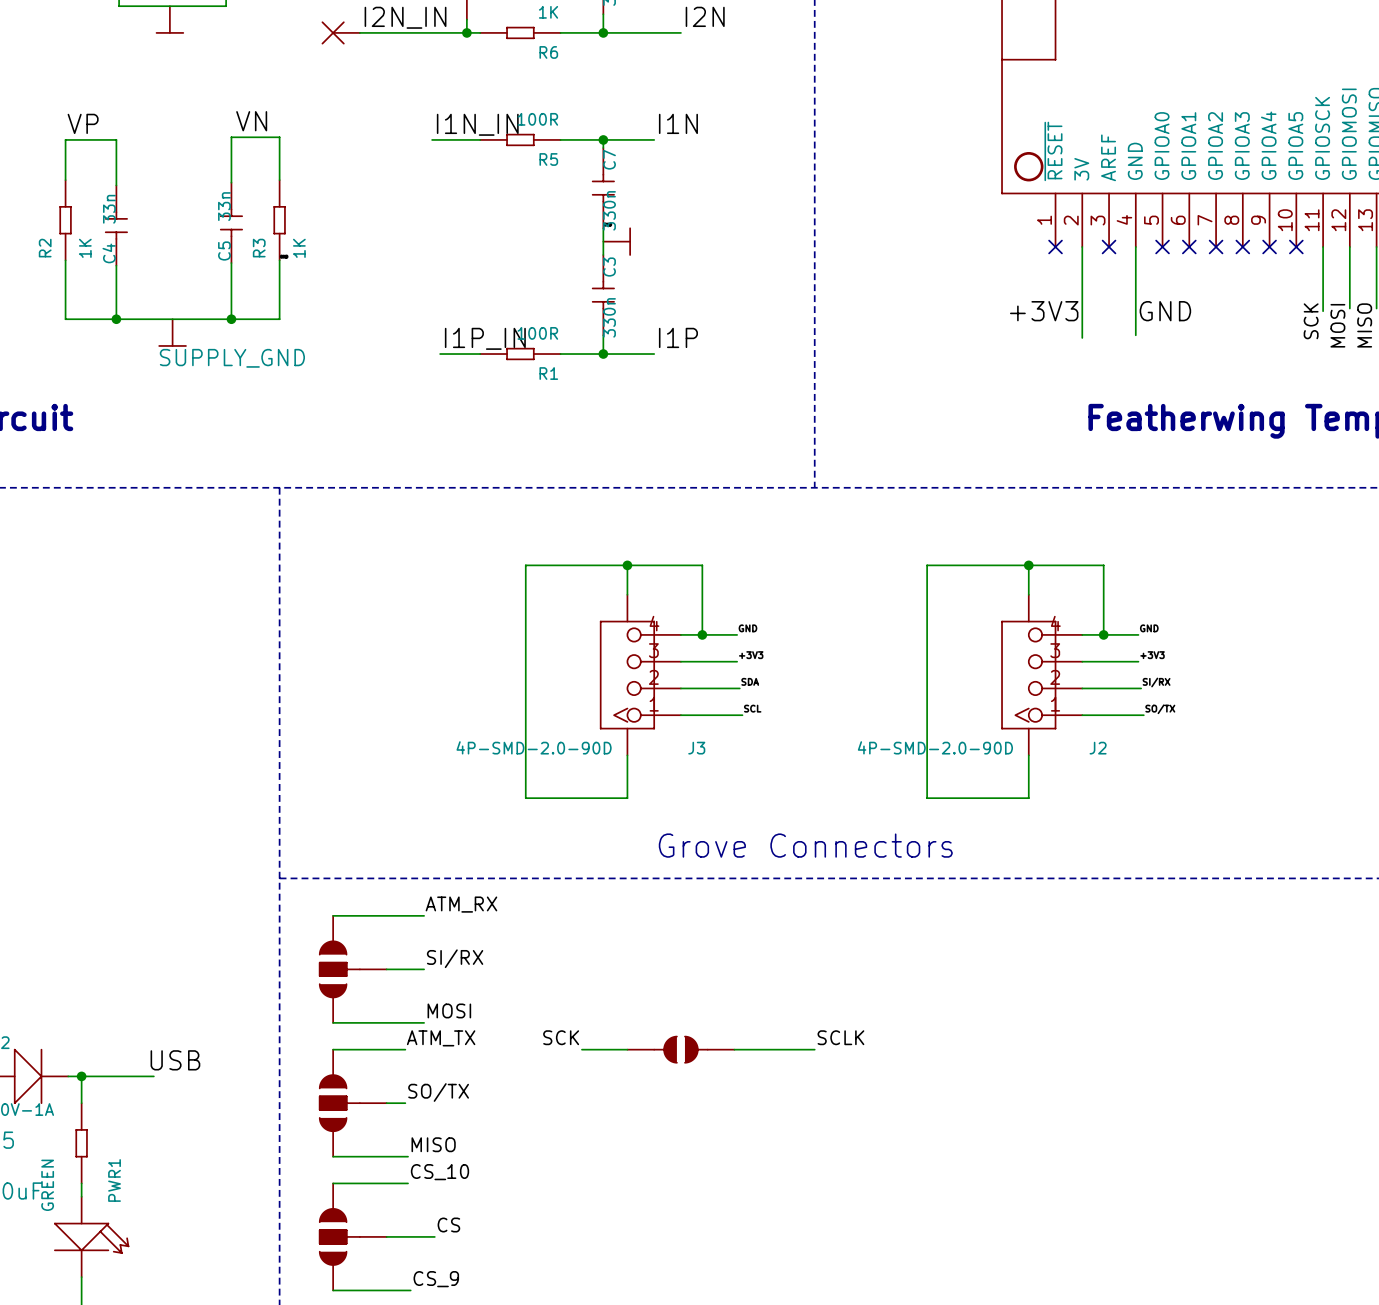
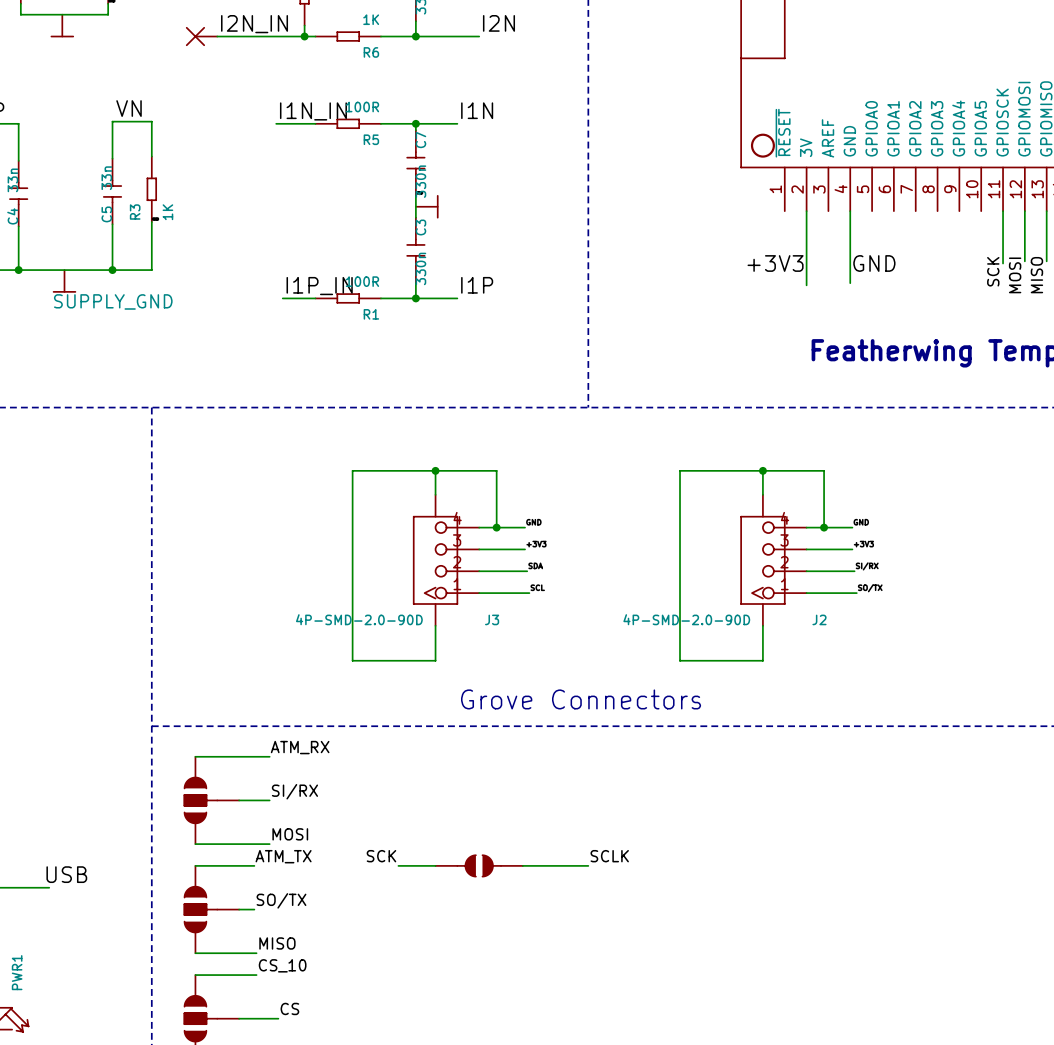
no-connect mark: (1055, 246) -> none
no-connect mark: (1109, 246) -> none
no-connect mark: (1162, 246) -> none
no-connect mark: (1189, 246) -> none
no-connect mark: (1216, 246) -> none
no-connect mark: (1242, 246) -> none
no-connect mark: (1269, 246) -> none
no-connect mark: (1296, 246) -> none

